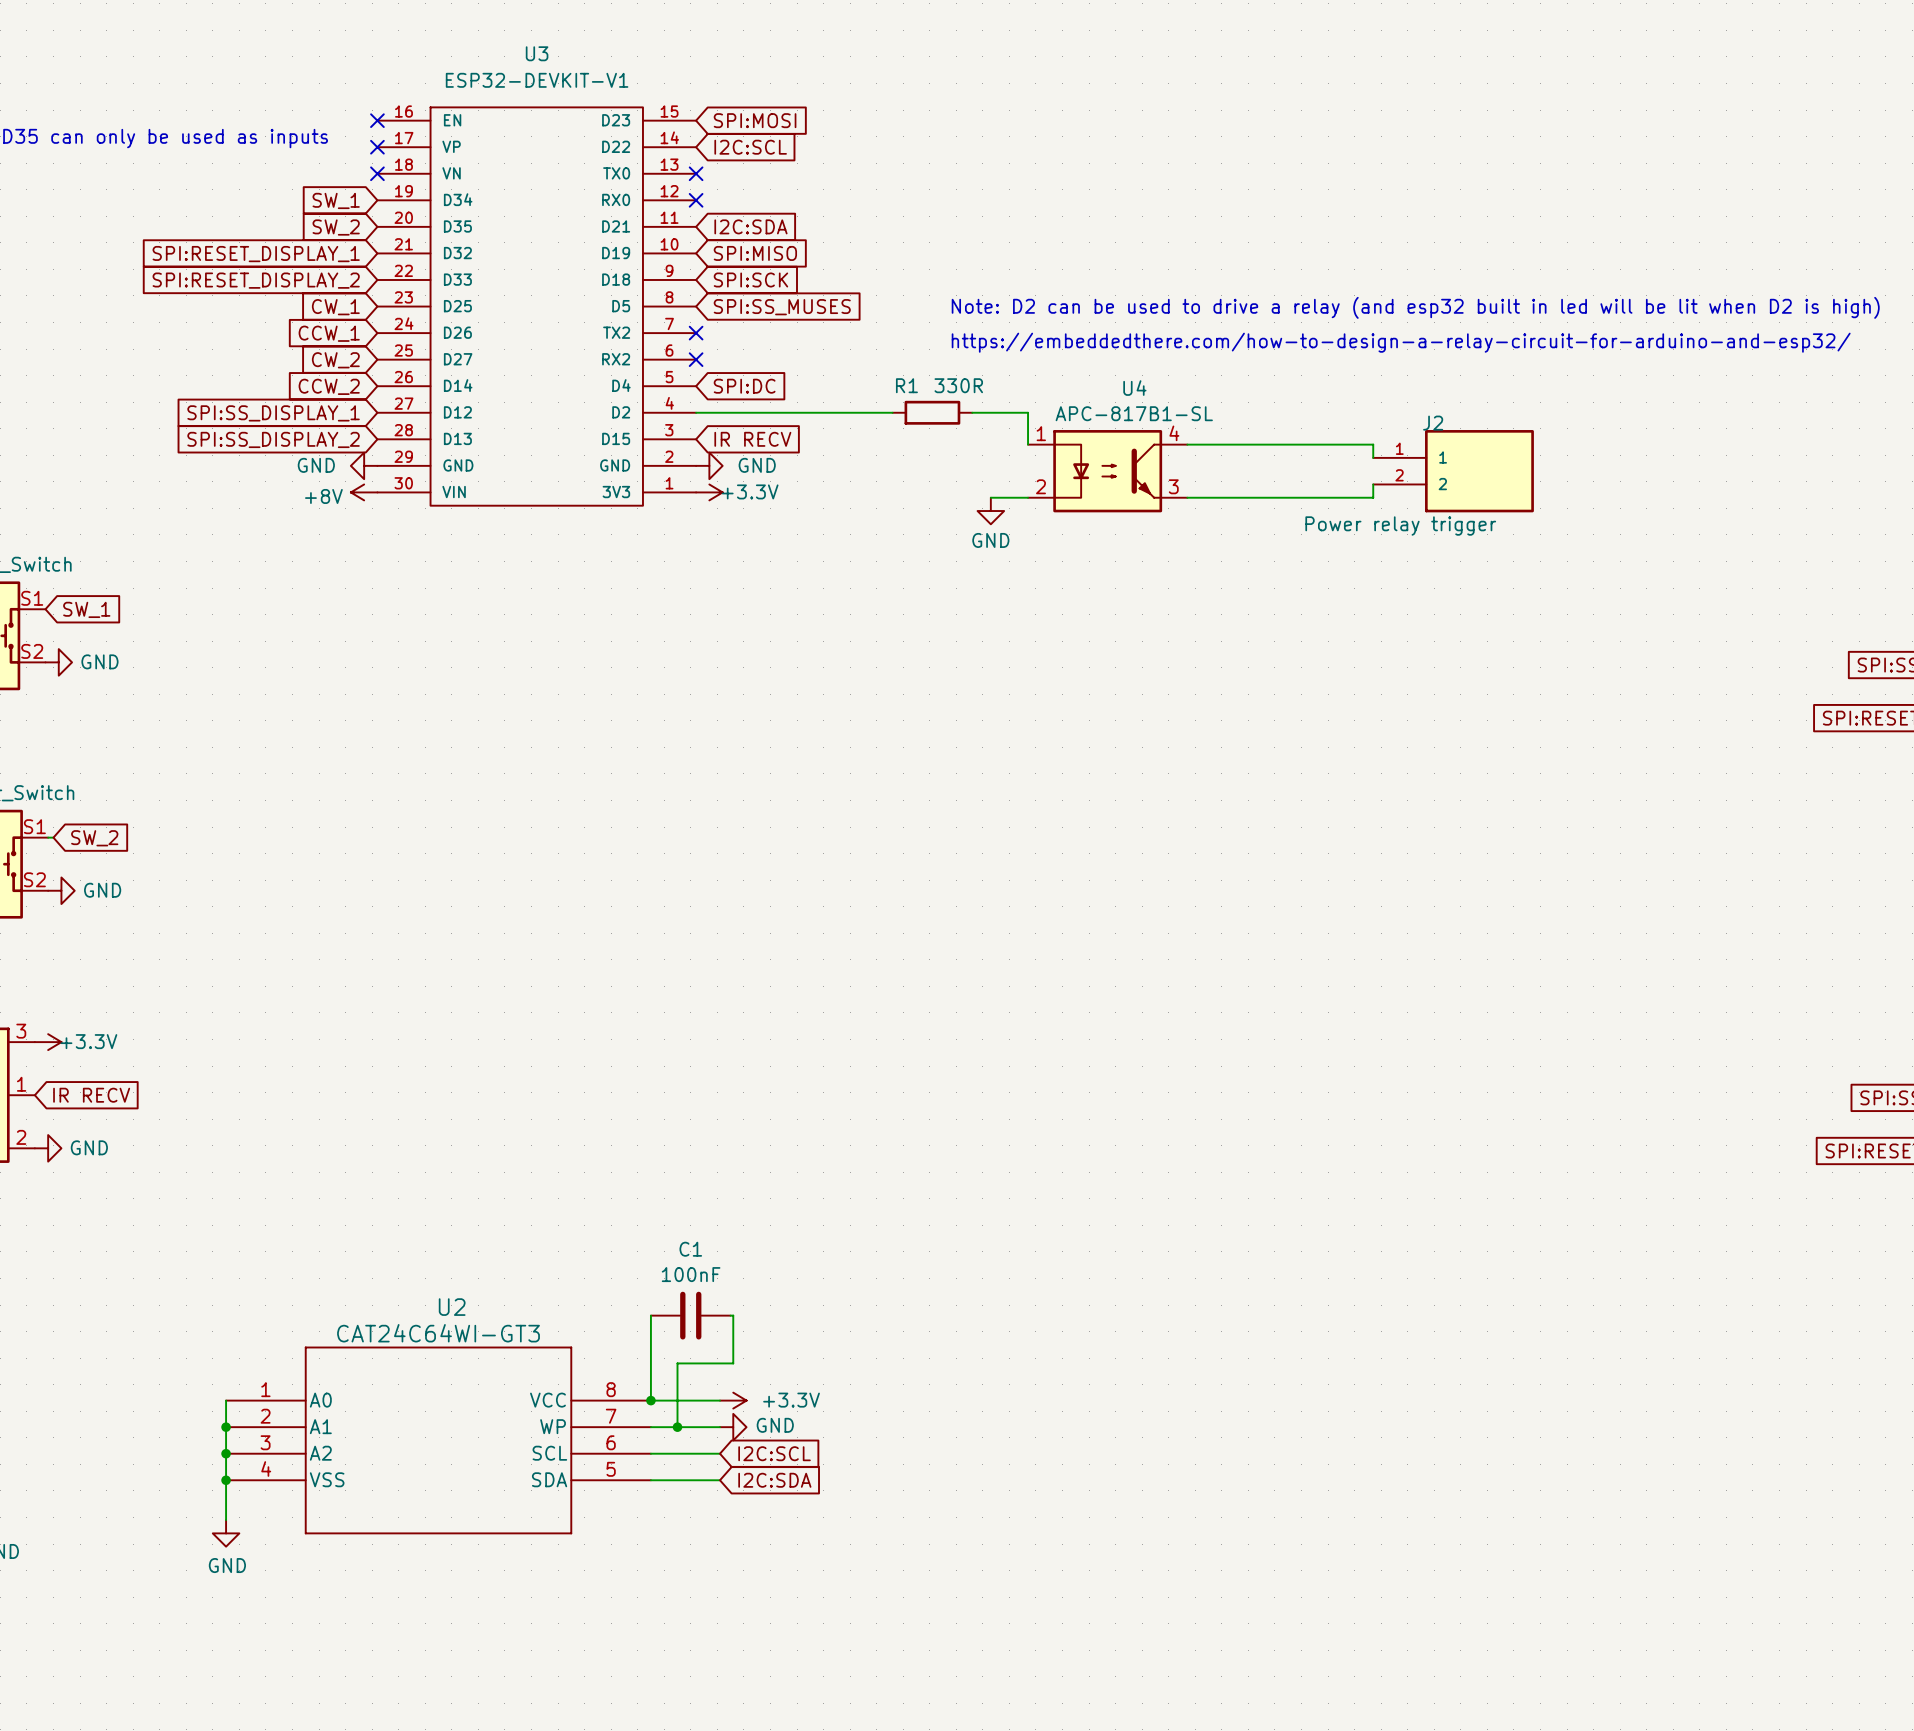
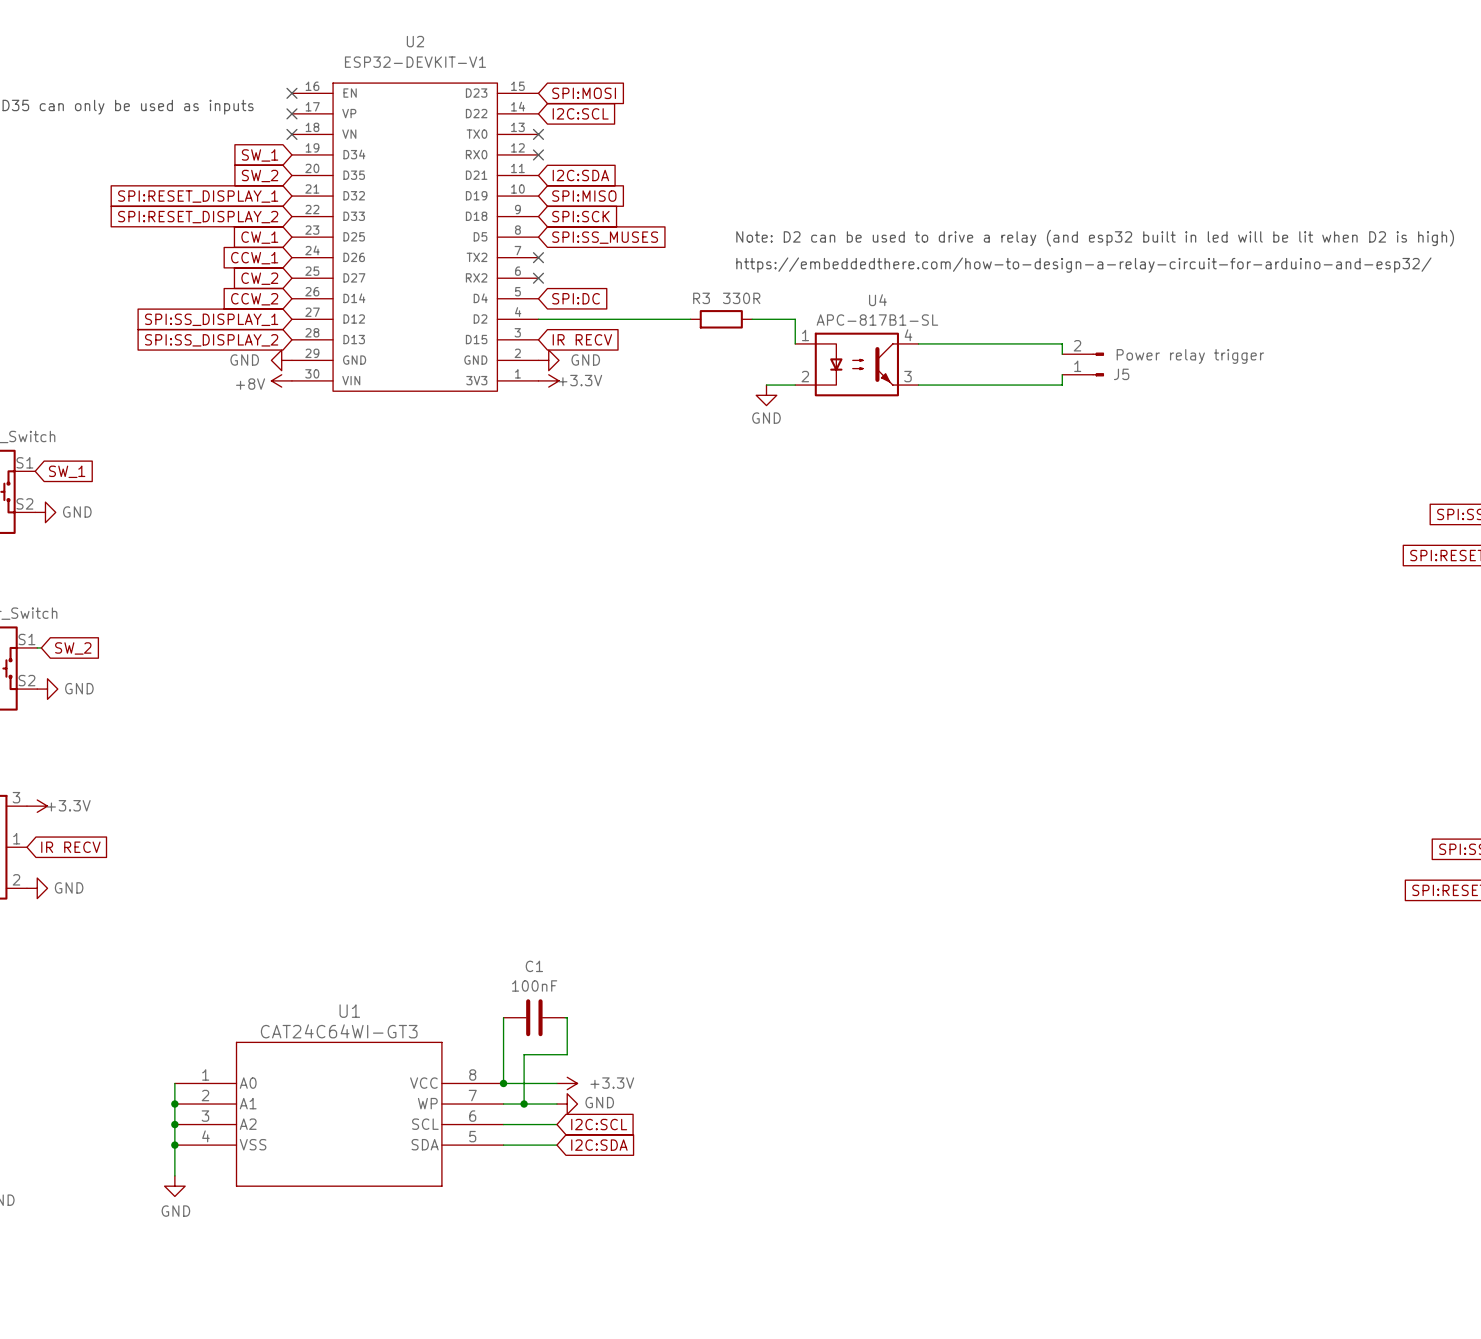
U3 name: U3 (537, 53) -> U2 (415, 41)
R1 name: R1 (906, 385) -> R3 (701, 298)
J5: none -> Power relay trigger (1083, 364)
J2: Power relay trigger (1453, 471) -> none
U2 name: U2 (452, 1307) -> U1 (349, 1011)

